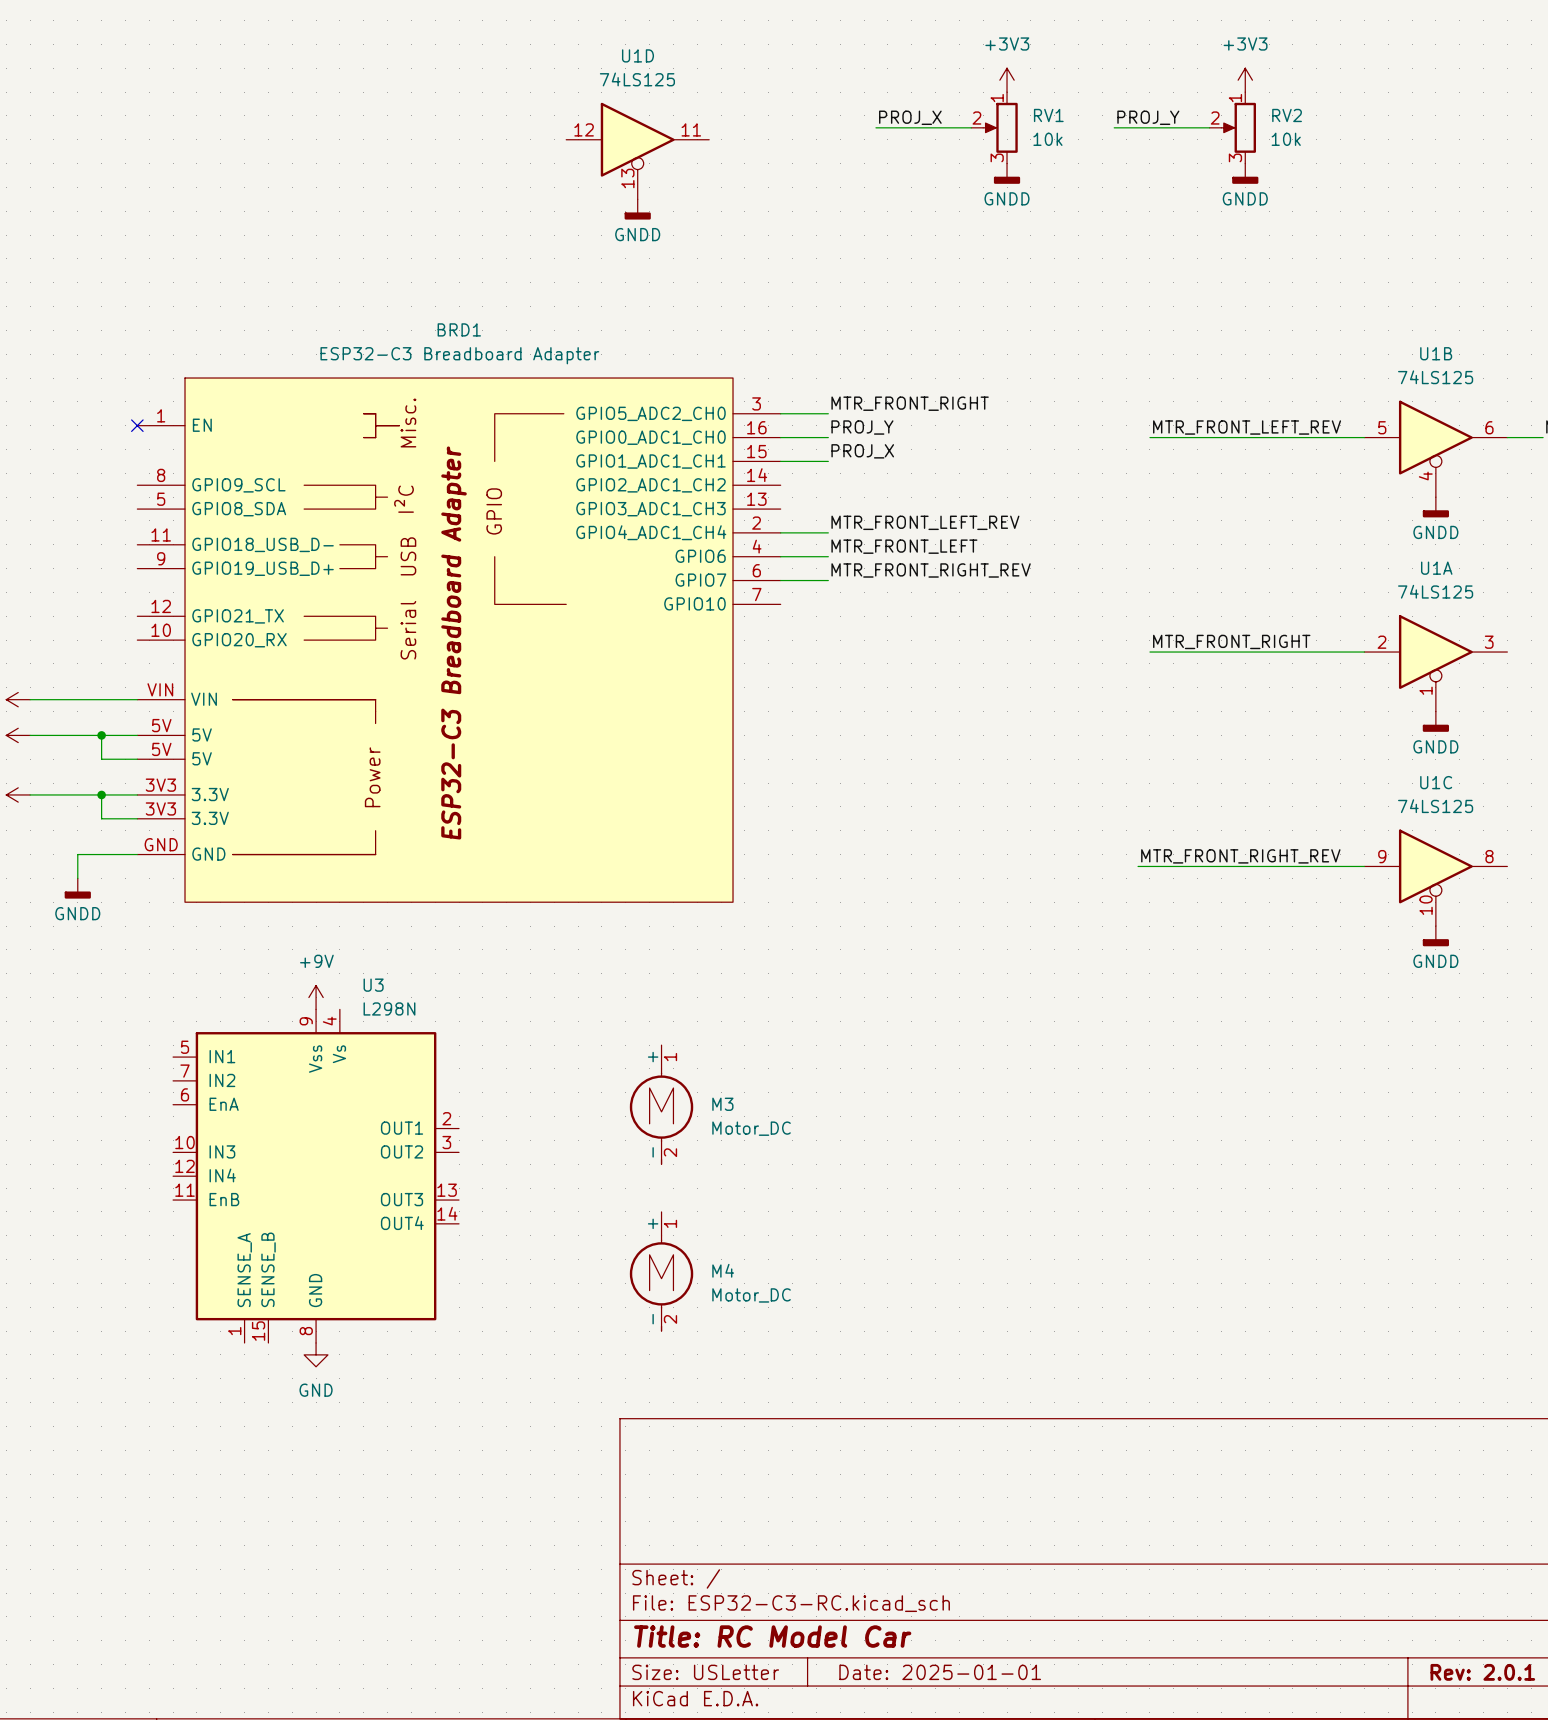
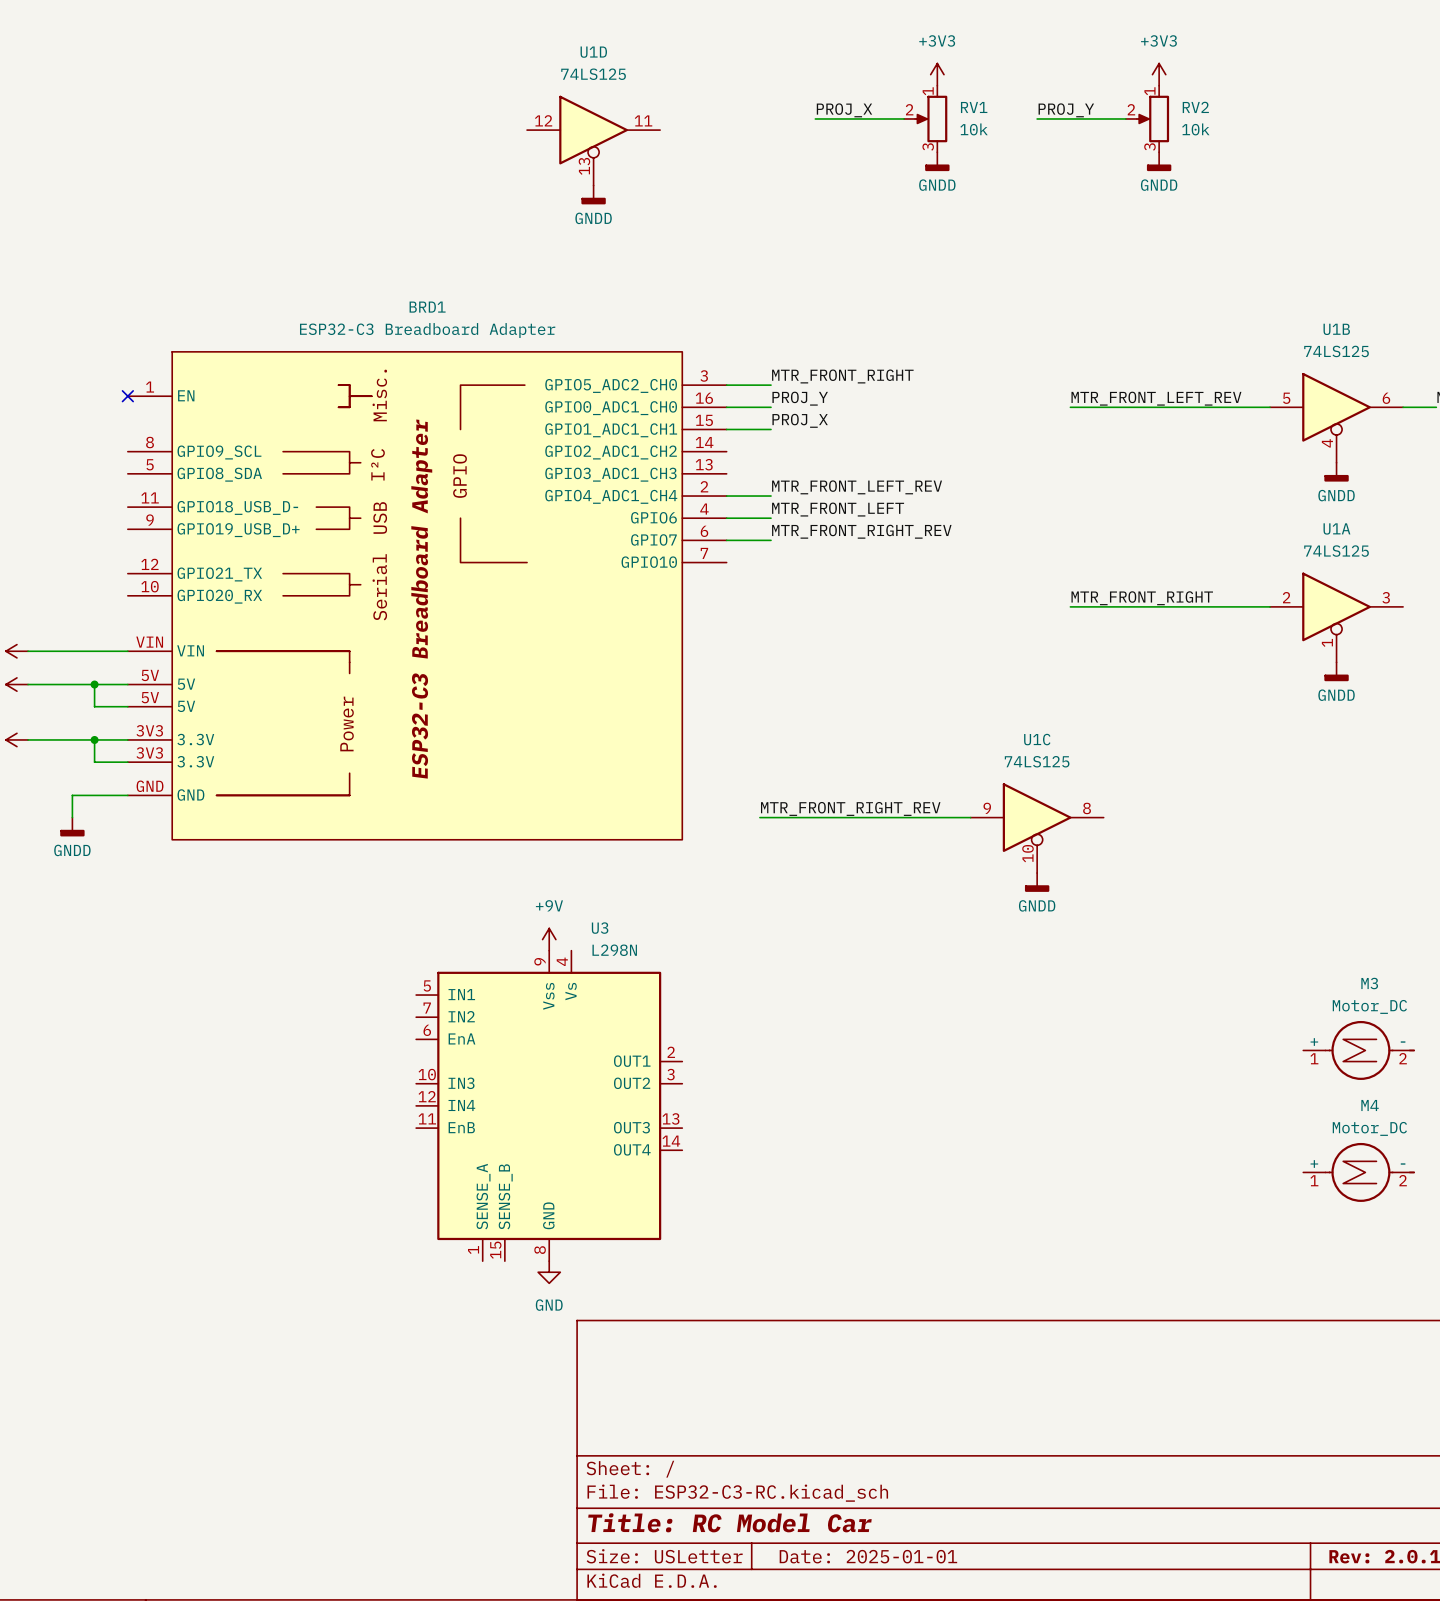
label: MTR_FRONT_RIGHT_REV (1240, 856) -> none
wire: (1138, 866) (1364, 866) -> none
label: none -> MTR_FRONT_RIGHT_REV (850, 808)
U1C position: (1435, 877) -> (1037, 828)
wire: none -> (759, 817) (970, 817)
power symbol: GNDD (1435, 936) -> none
power symbol: none -> GNDD (1037, 882)
power symbol: +9V (316, 997) -> none
power symbol: none -> +9V (549, 939)
M3 position: (661, 1104) -> (1358, 1050)
M3 rotation: 0° (661, 1116) -> 90° counterclockwise (1369, 1050)
M3 value position: Motor_DC (751, 1128) -> Motor_DC (1369, 1006)
U3 position: (316, 1176) -> (549, 1105)
M4 position: (661, 1271) -> (1358, 1172)
M4 rotation: 0° (661, 1283) -> 90° counterclockwise (1369, 1172)
M4 value position: Motor_DC (751, 1295) -> Motor_DC (1369, 1128)
power symbol: GND (316, 1354) -> none
power symbol: none -> GND (549, 1272)

